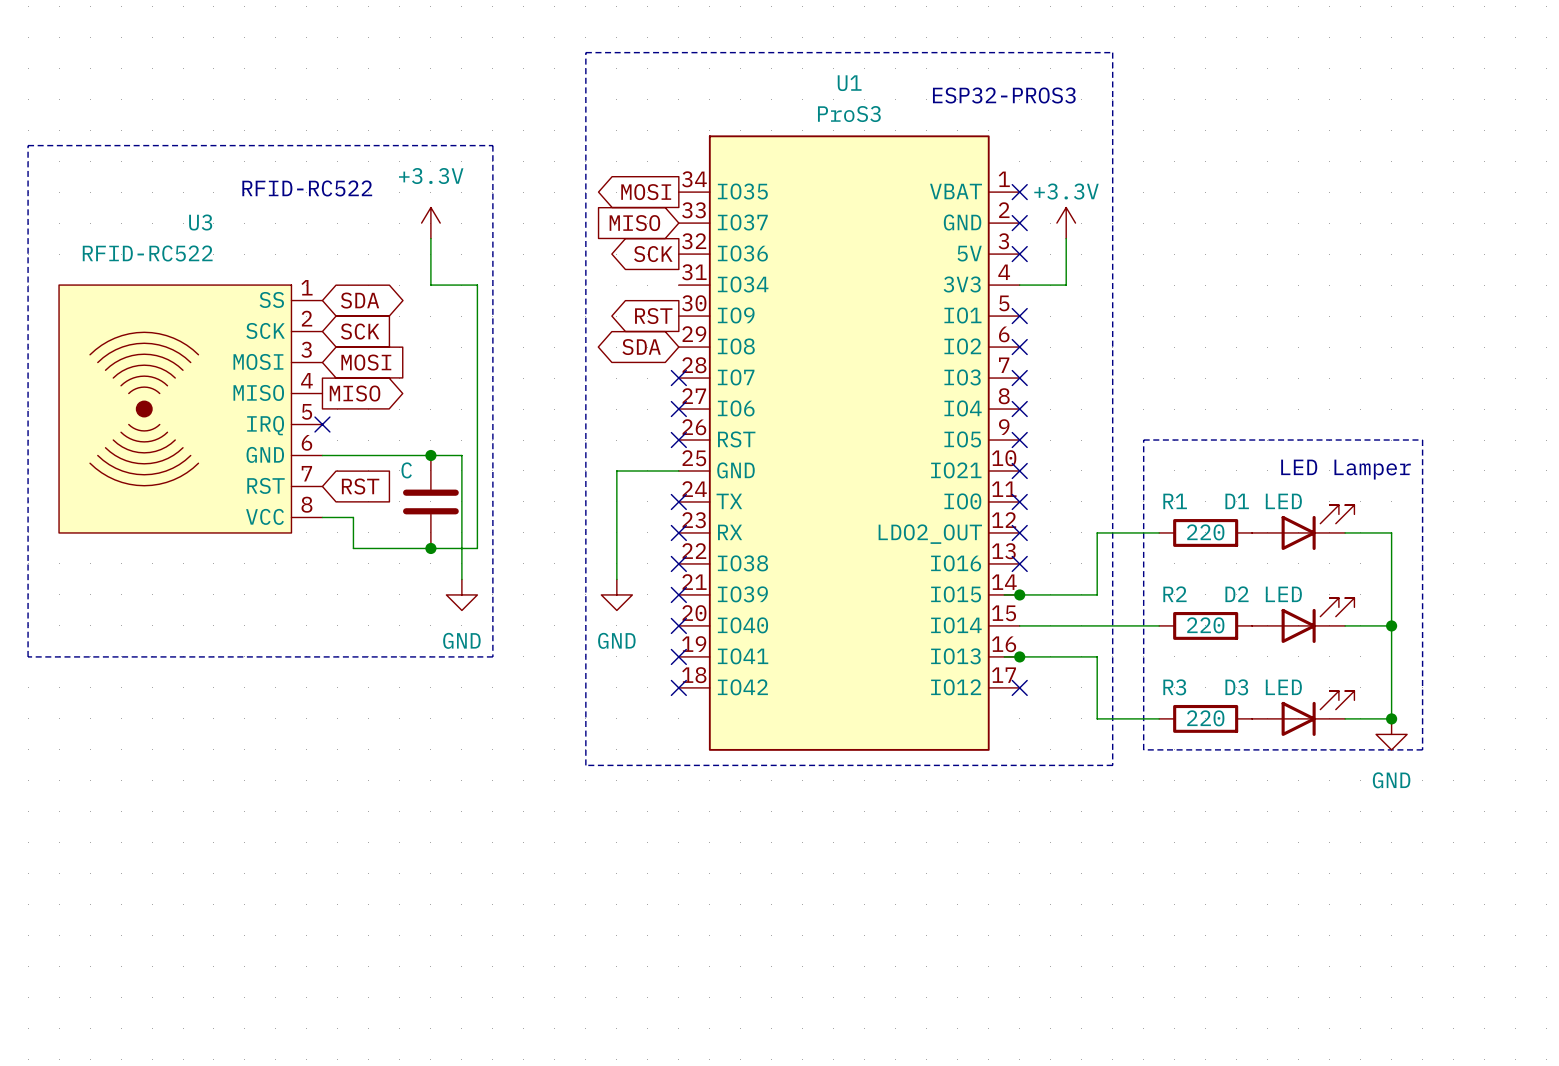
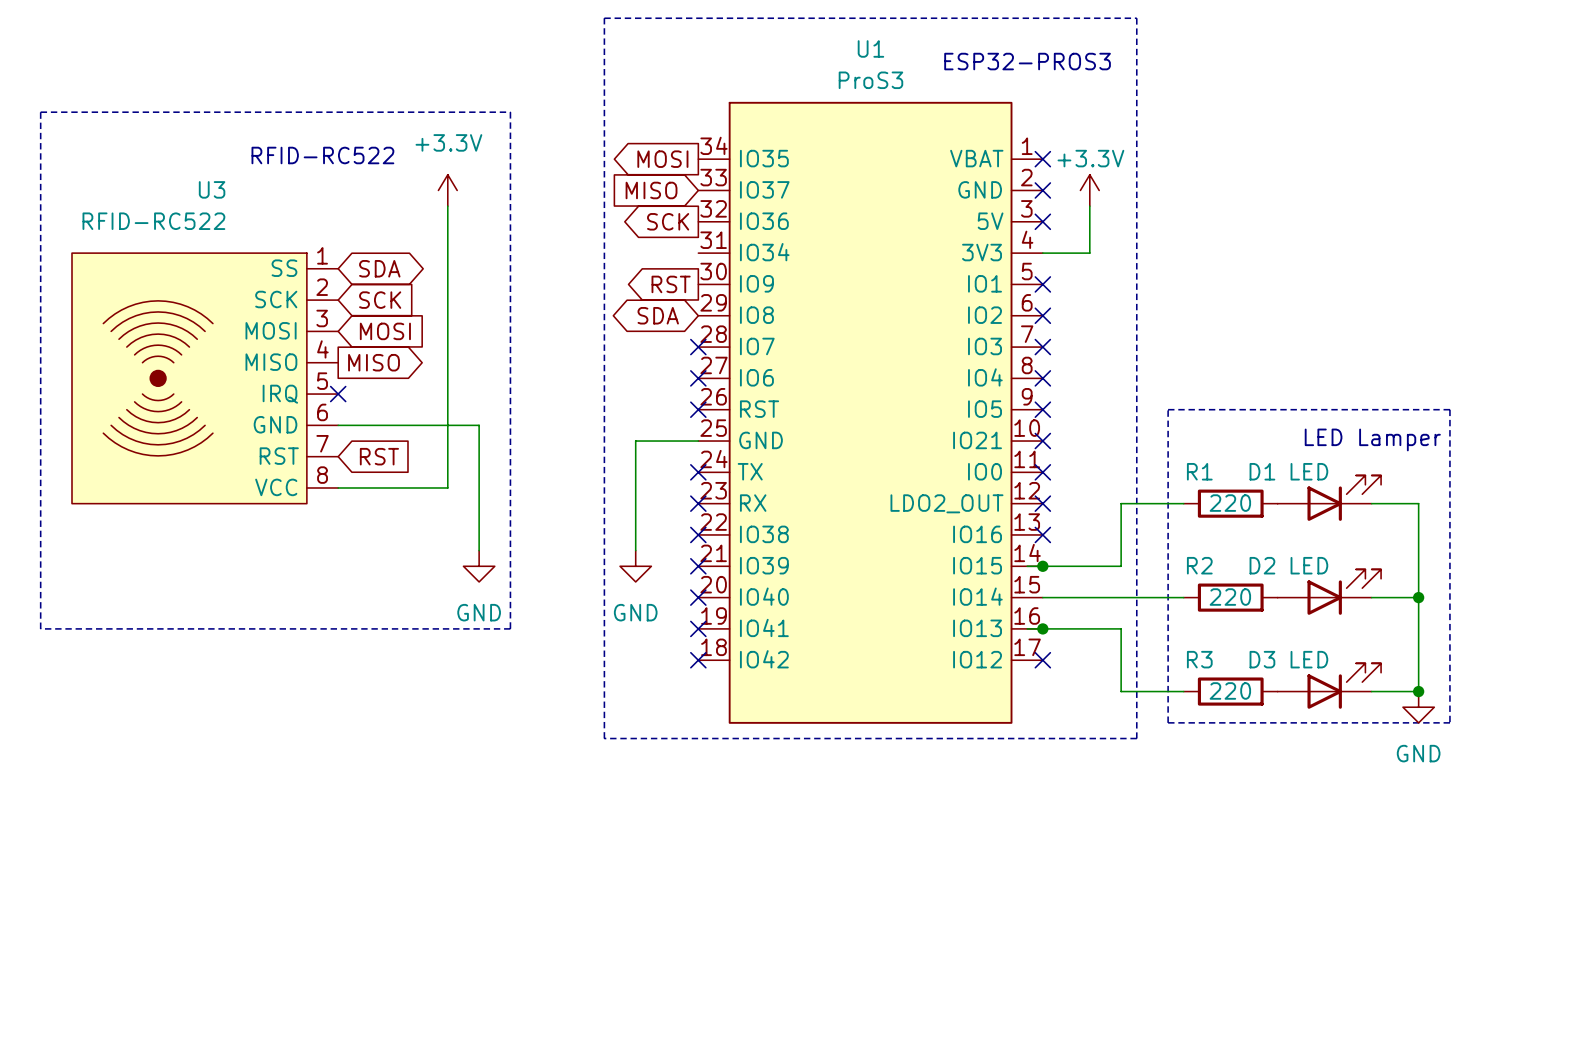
wire: (430, 285) (477, 285) (477, 548) (353, 548) (353, 517) -> (447, 253) (447, 487) (369, 487)
junction: (430, 455) -> none
part: C (430, 501) -> none
junction: (430, 548) -> none

